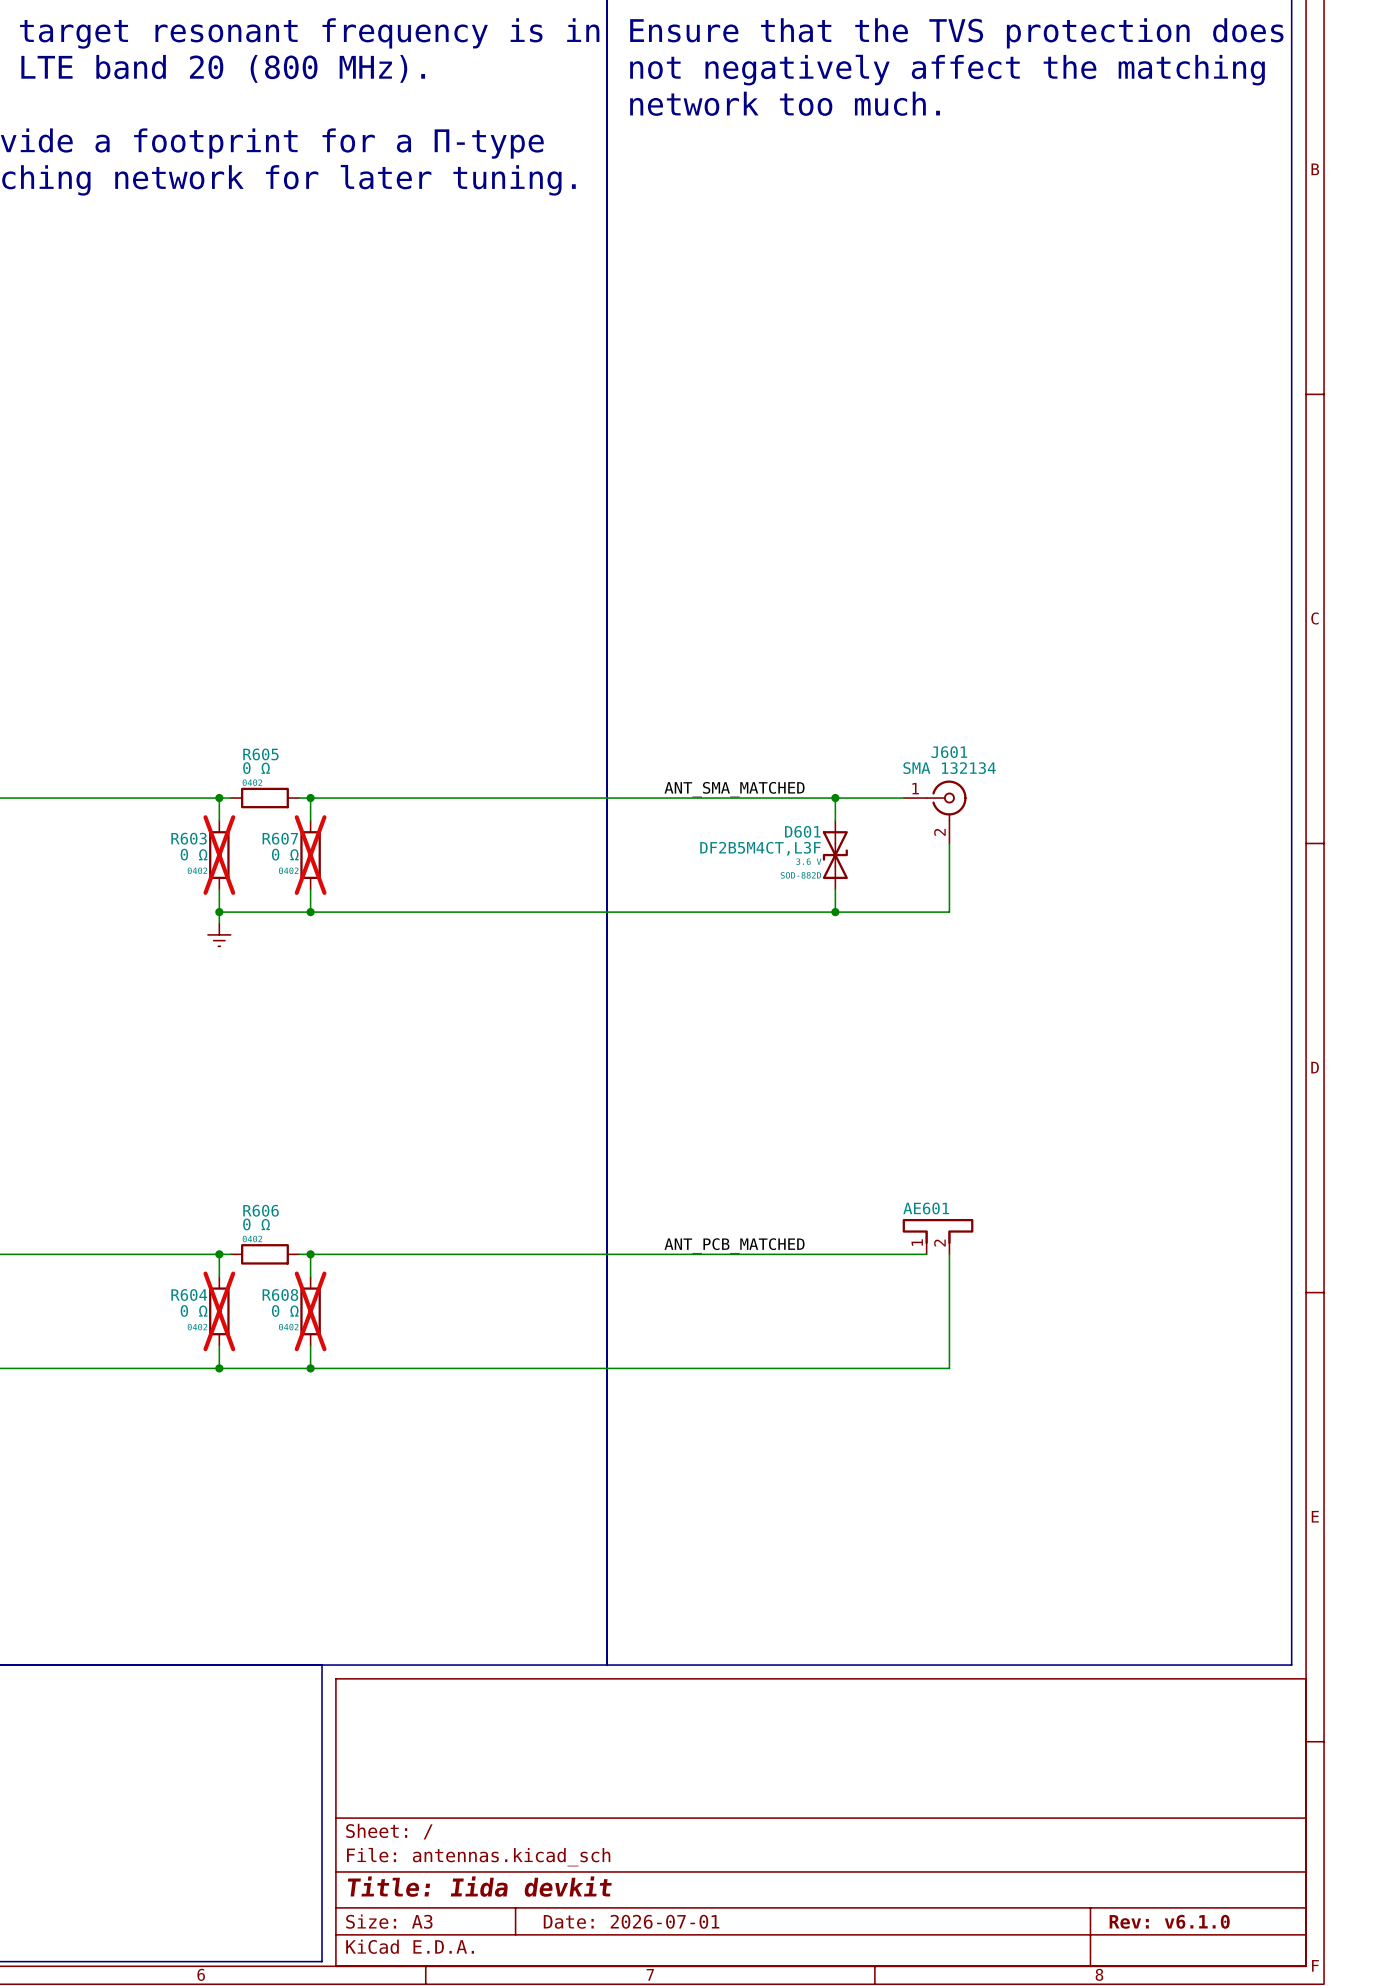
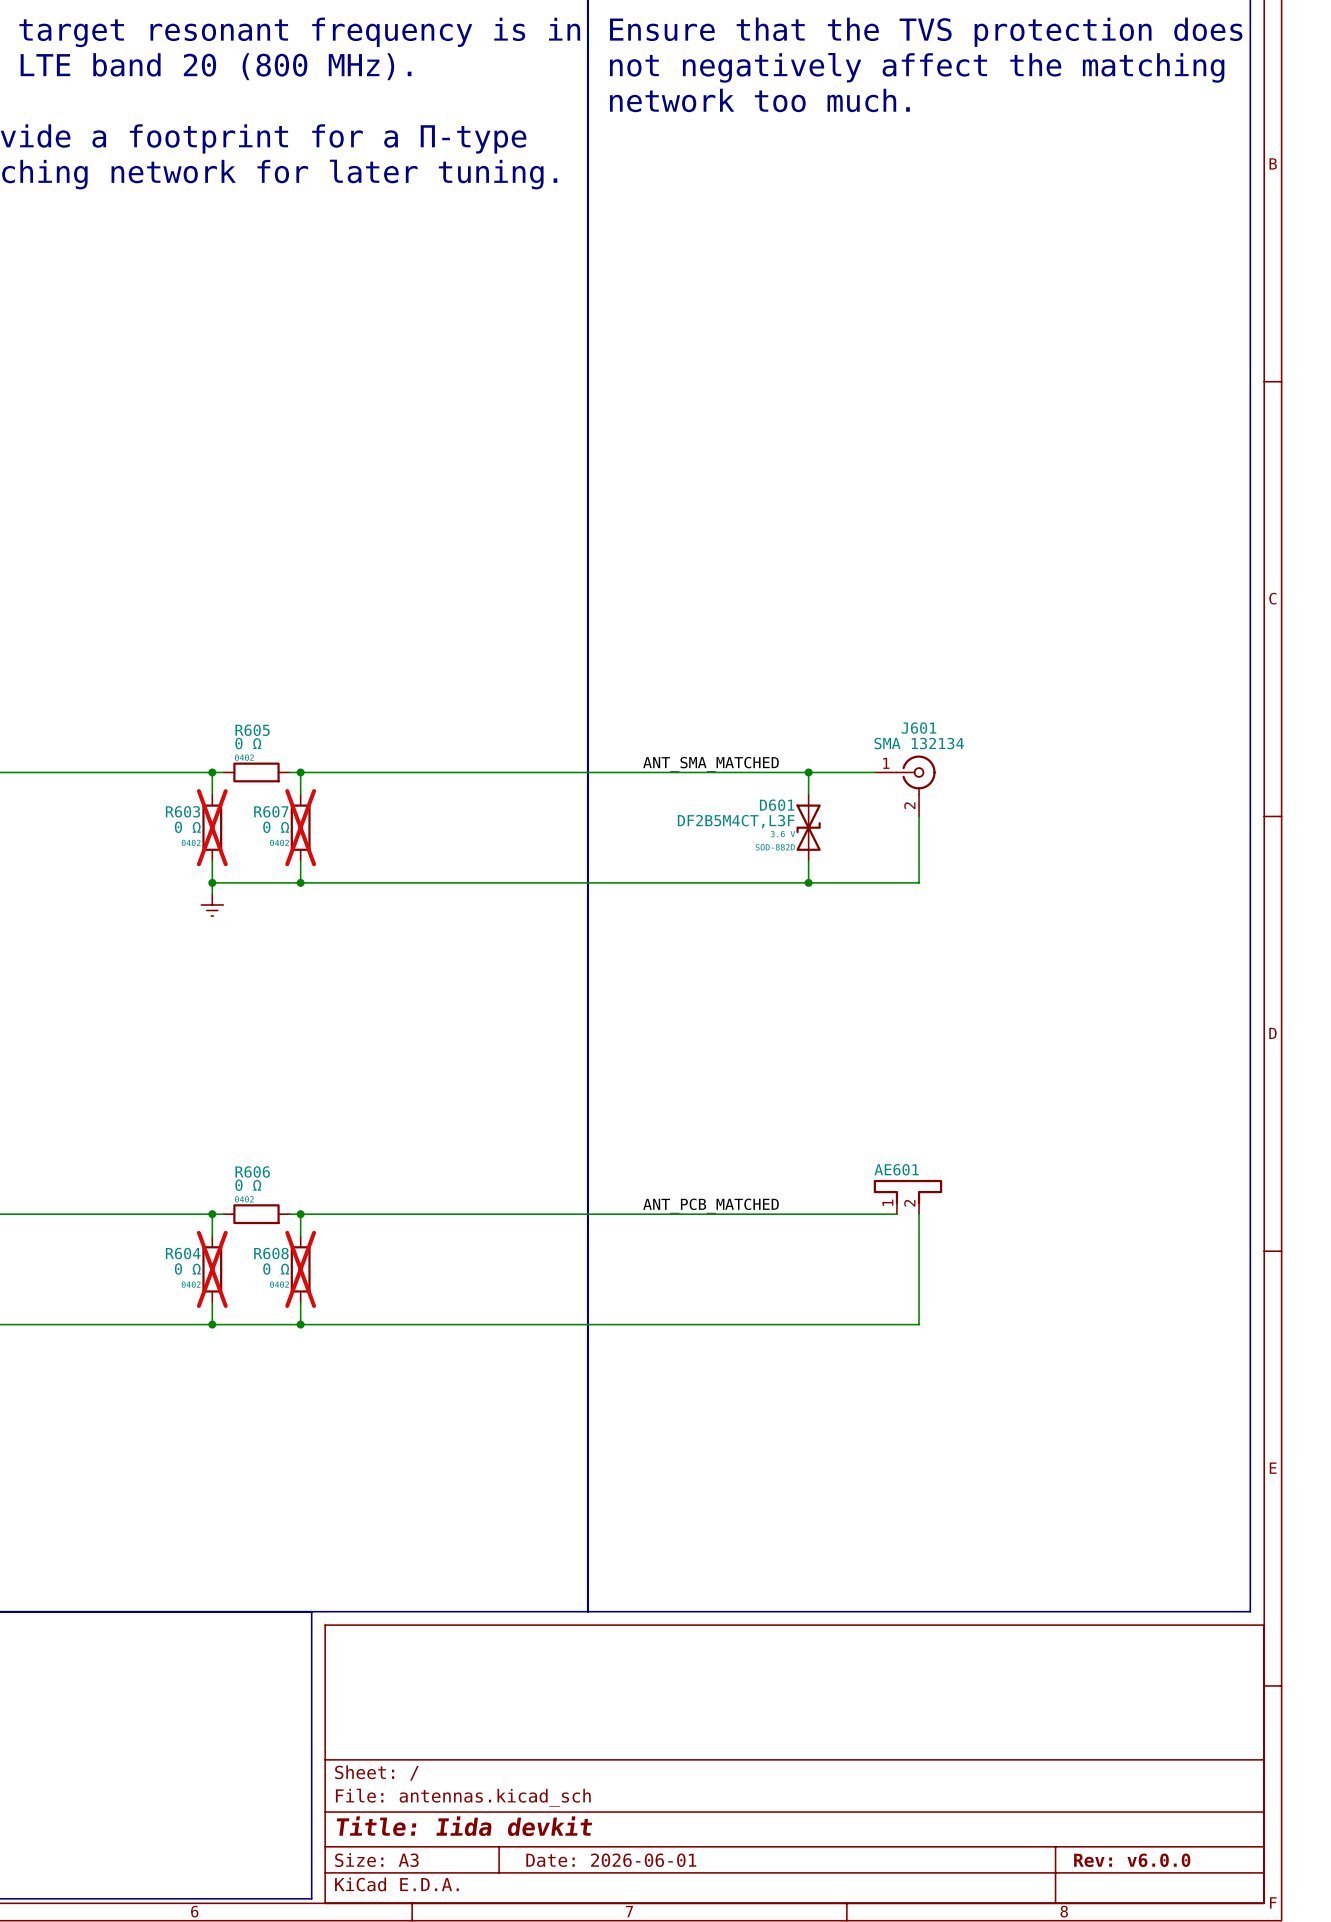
title block: Date: 2026-07-01 (631, 1921) -> Date: 2026-06-01 (611, 1860)
title block: Rev: v6.1.0 (1169, 1921) -> Rev: v6.0.0 (1132, 1860)

